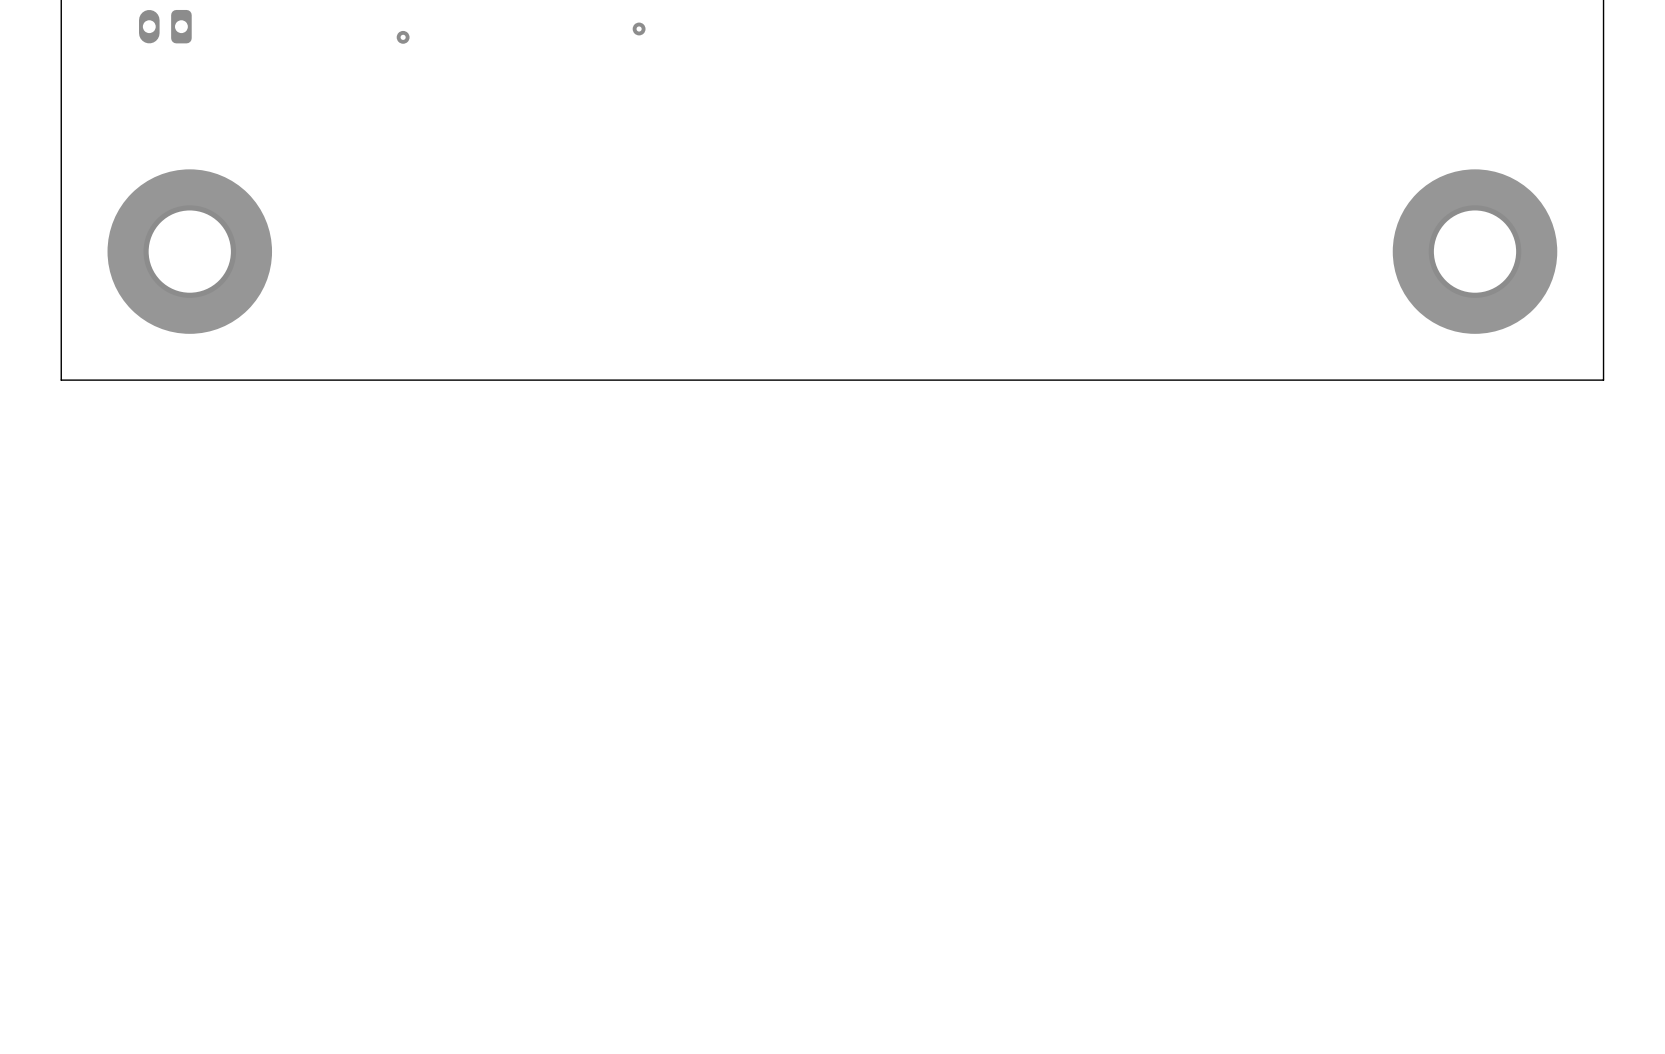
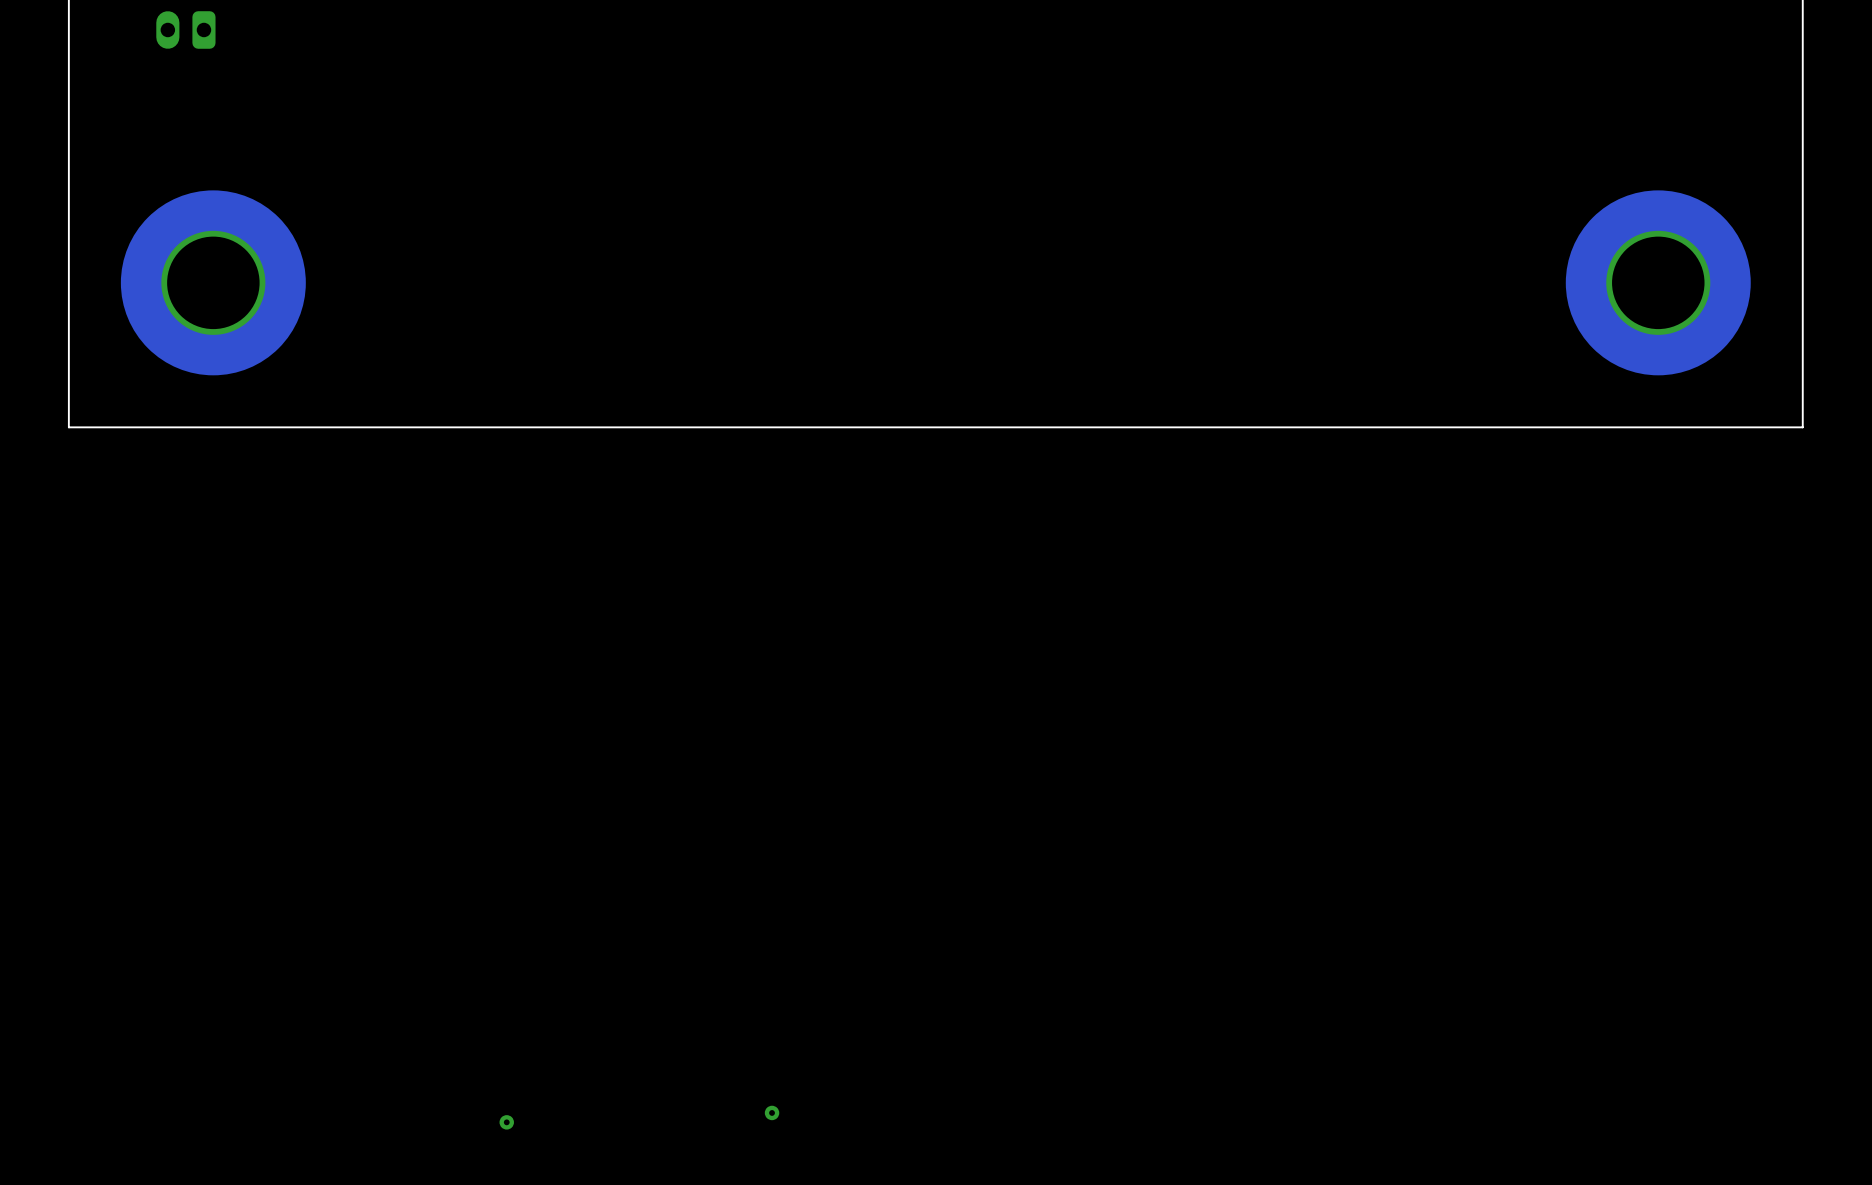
via: (639, 28) -> none
via: (403, 37) -> none
via: none -> (772, 1112)
via: none -> (506, 1122)

